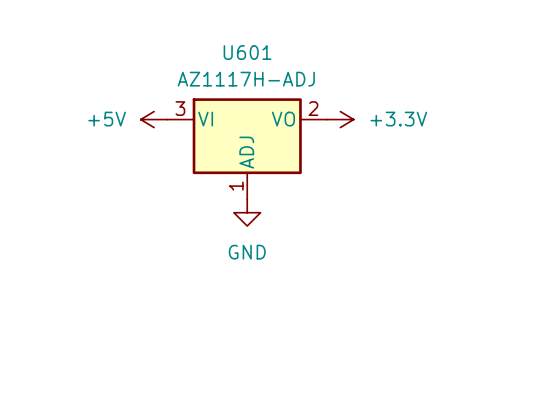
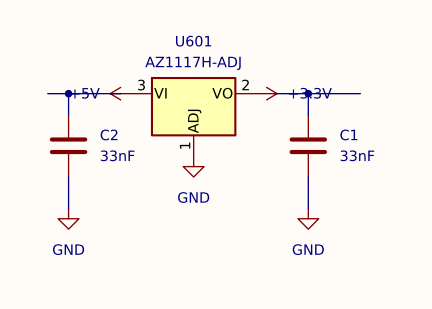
wire: none -> (47, 93) (120, 93)
wire: none -> (68, 93) (68, 114)
junction: none -> (68, 93)
wire: none -> (277, 93) (360, 93)
wire: none -> (308, 93) (308, 114)
junction: none -> (308, 93)
C2: none -> 33nF (68, 145)
C1: none -> 33nF (308, 145)
wire: none -> (68, 177) (68, 208)
wire: none -> (308, 177) (308, 208)
power symbol: none -> GND (68, 218)
power symbol: none -> GND (308, 218)

